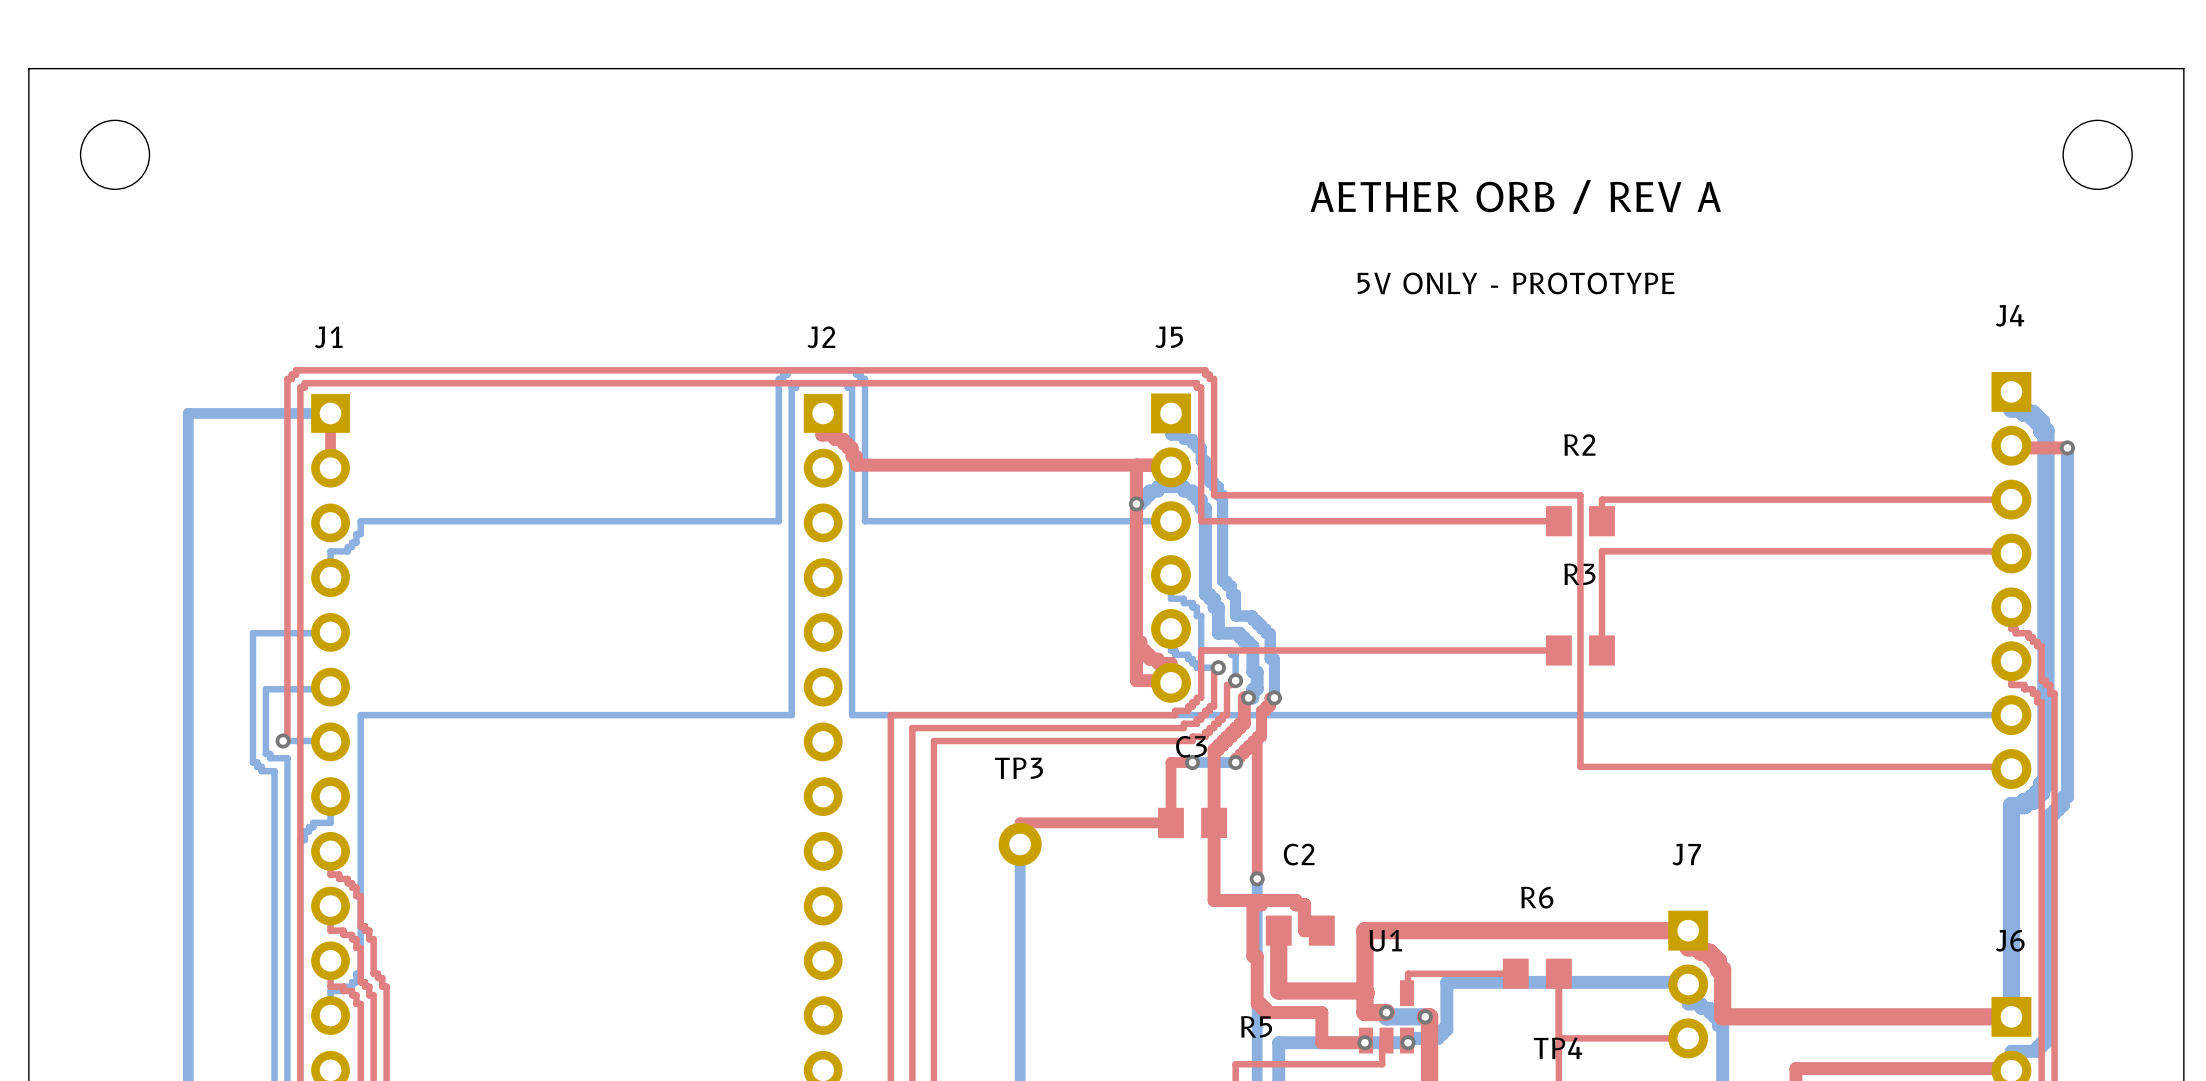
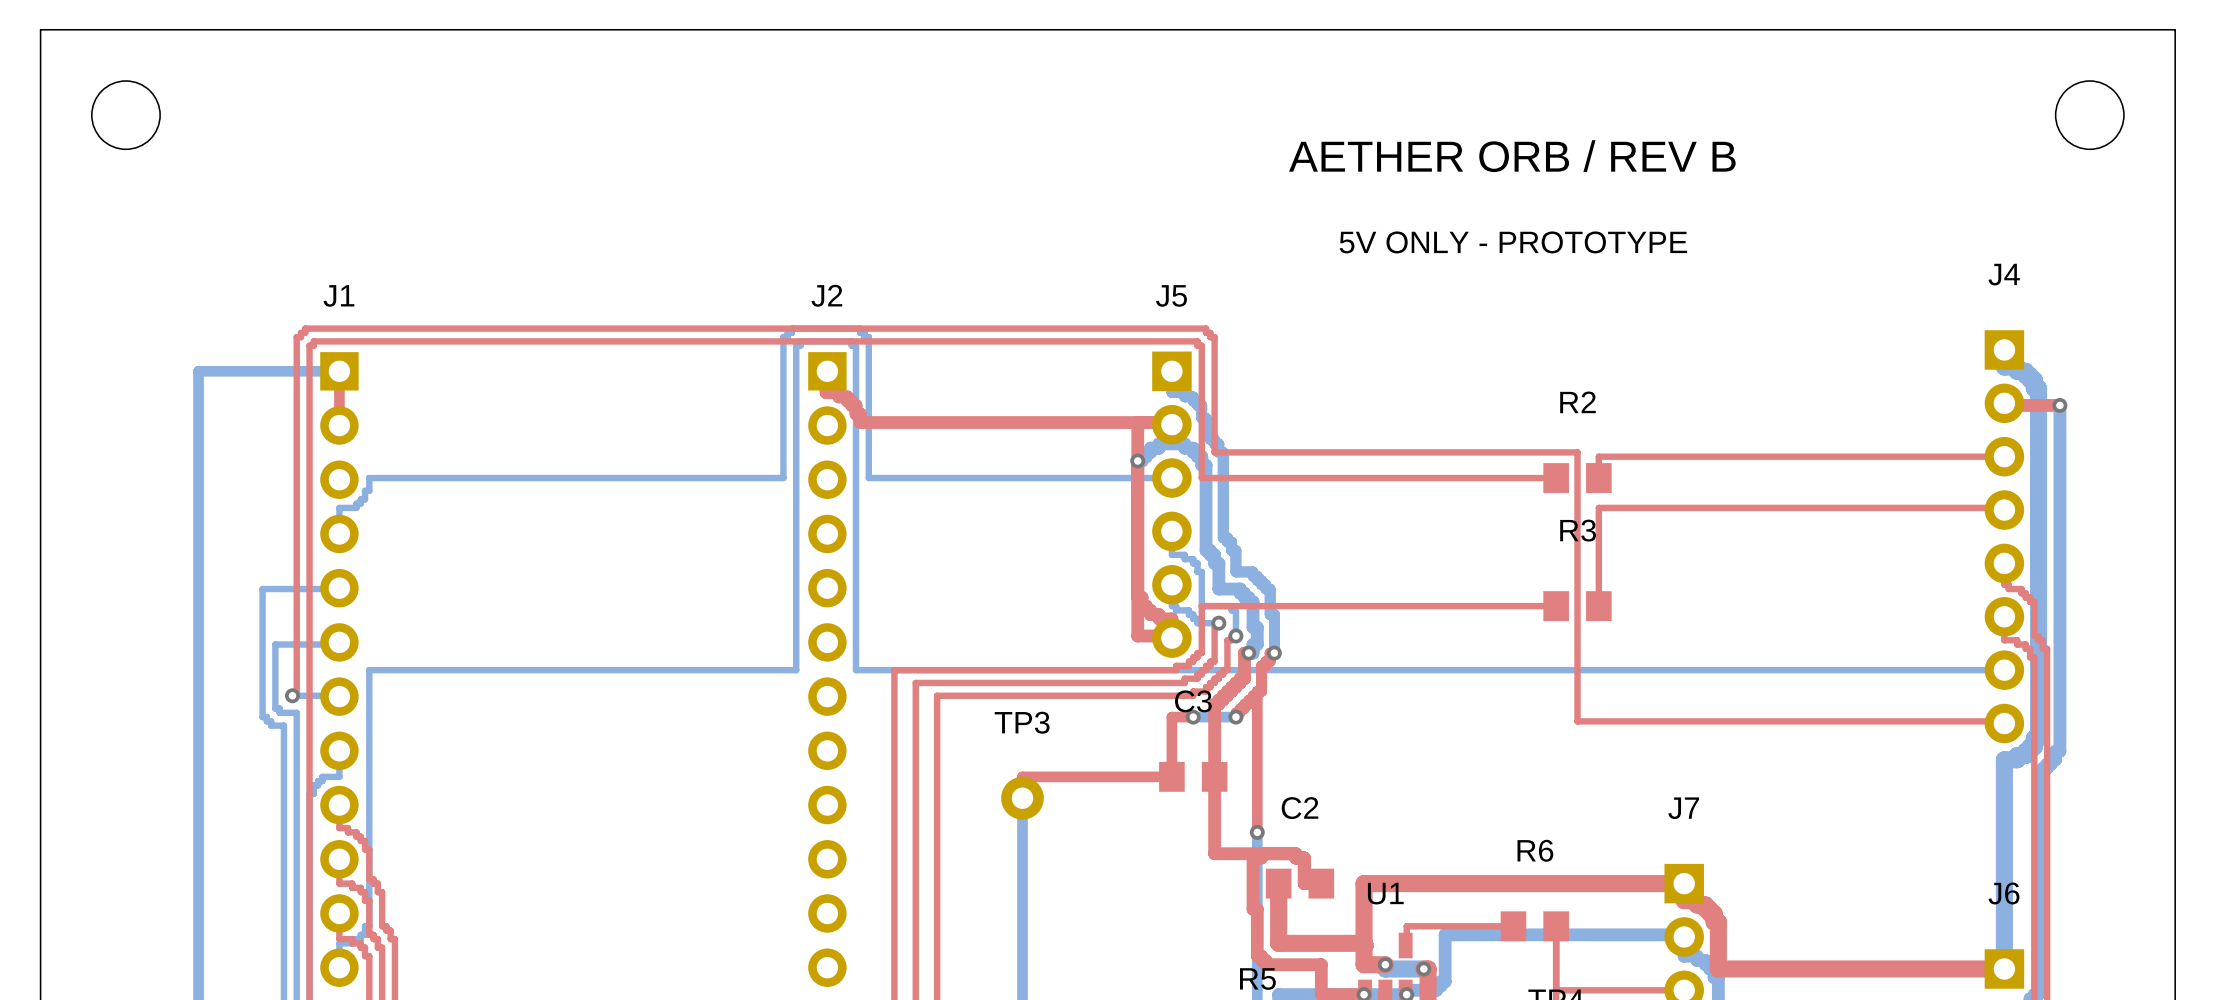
text: AETHER ORB / REV A (1515, 197) -> AETHER ORB / REV B (1512, 156)

